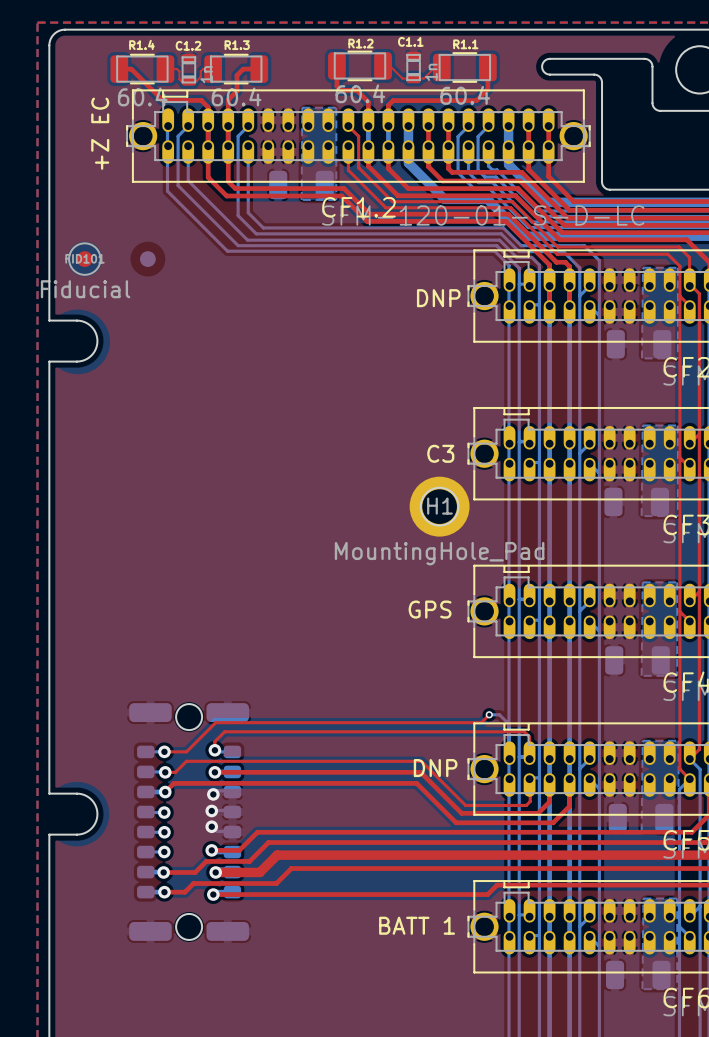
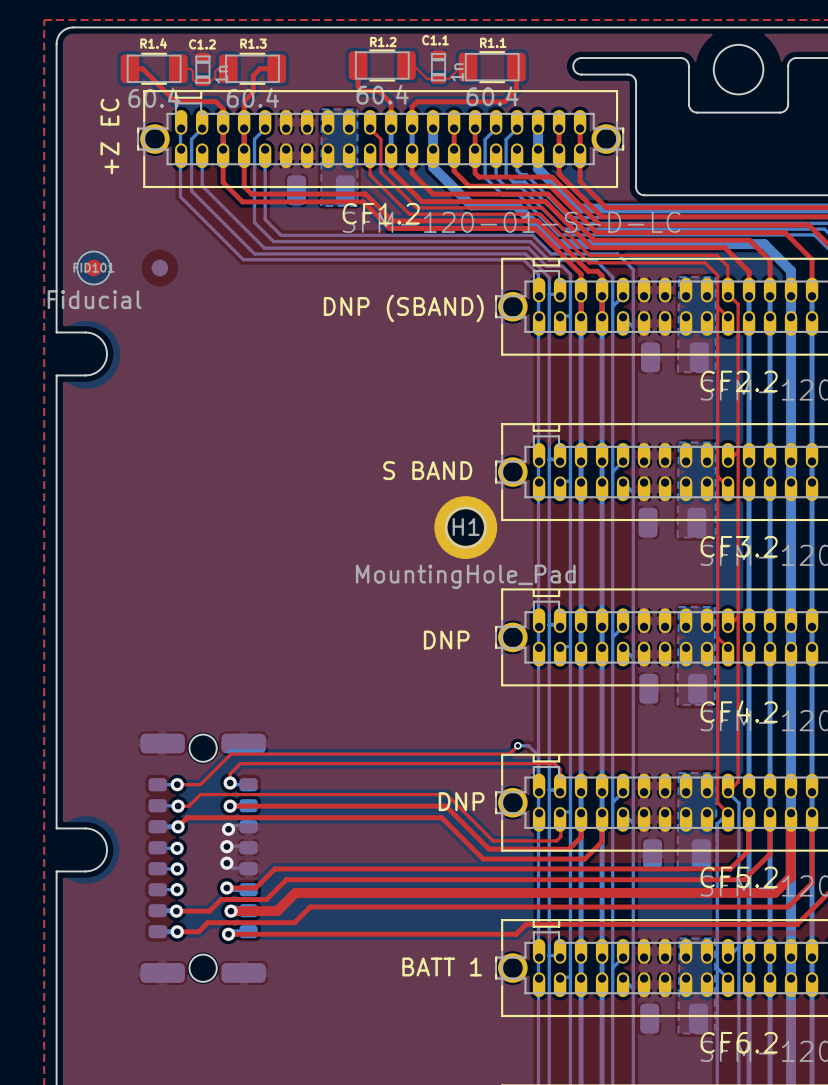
text: none -> DNP (SBAND) (403, 308)
text: DNP (438, 298) -> none
text: none -> S BAND (427, 470)
text: C3 (440, 453) -> none
text: GPS (430, 609) -> DNP (446, 640)

